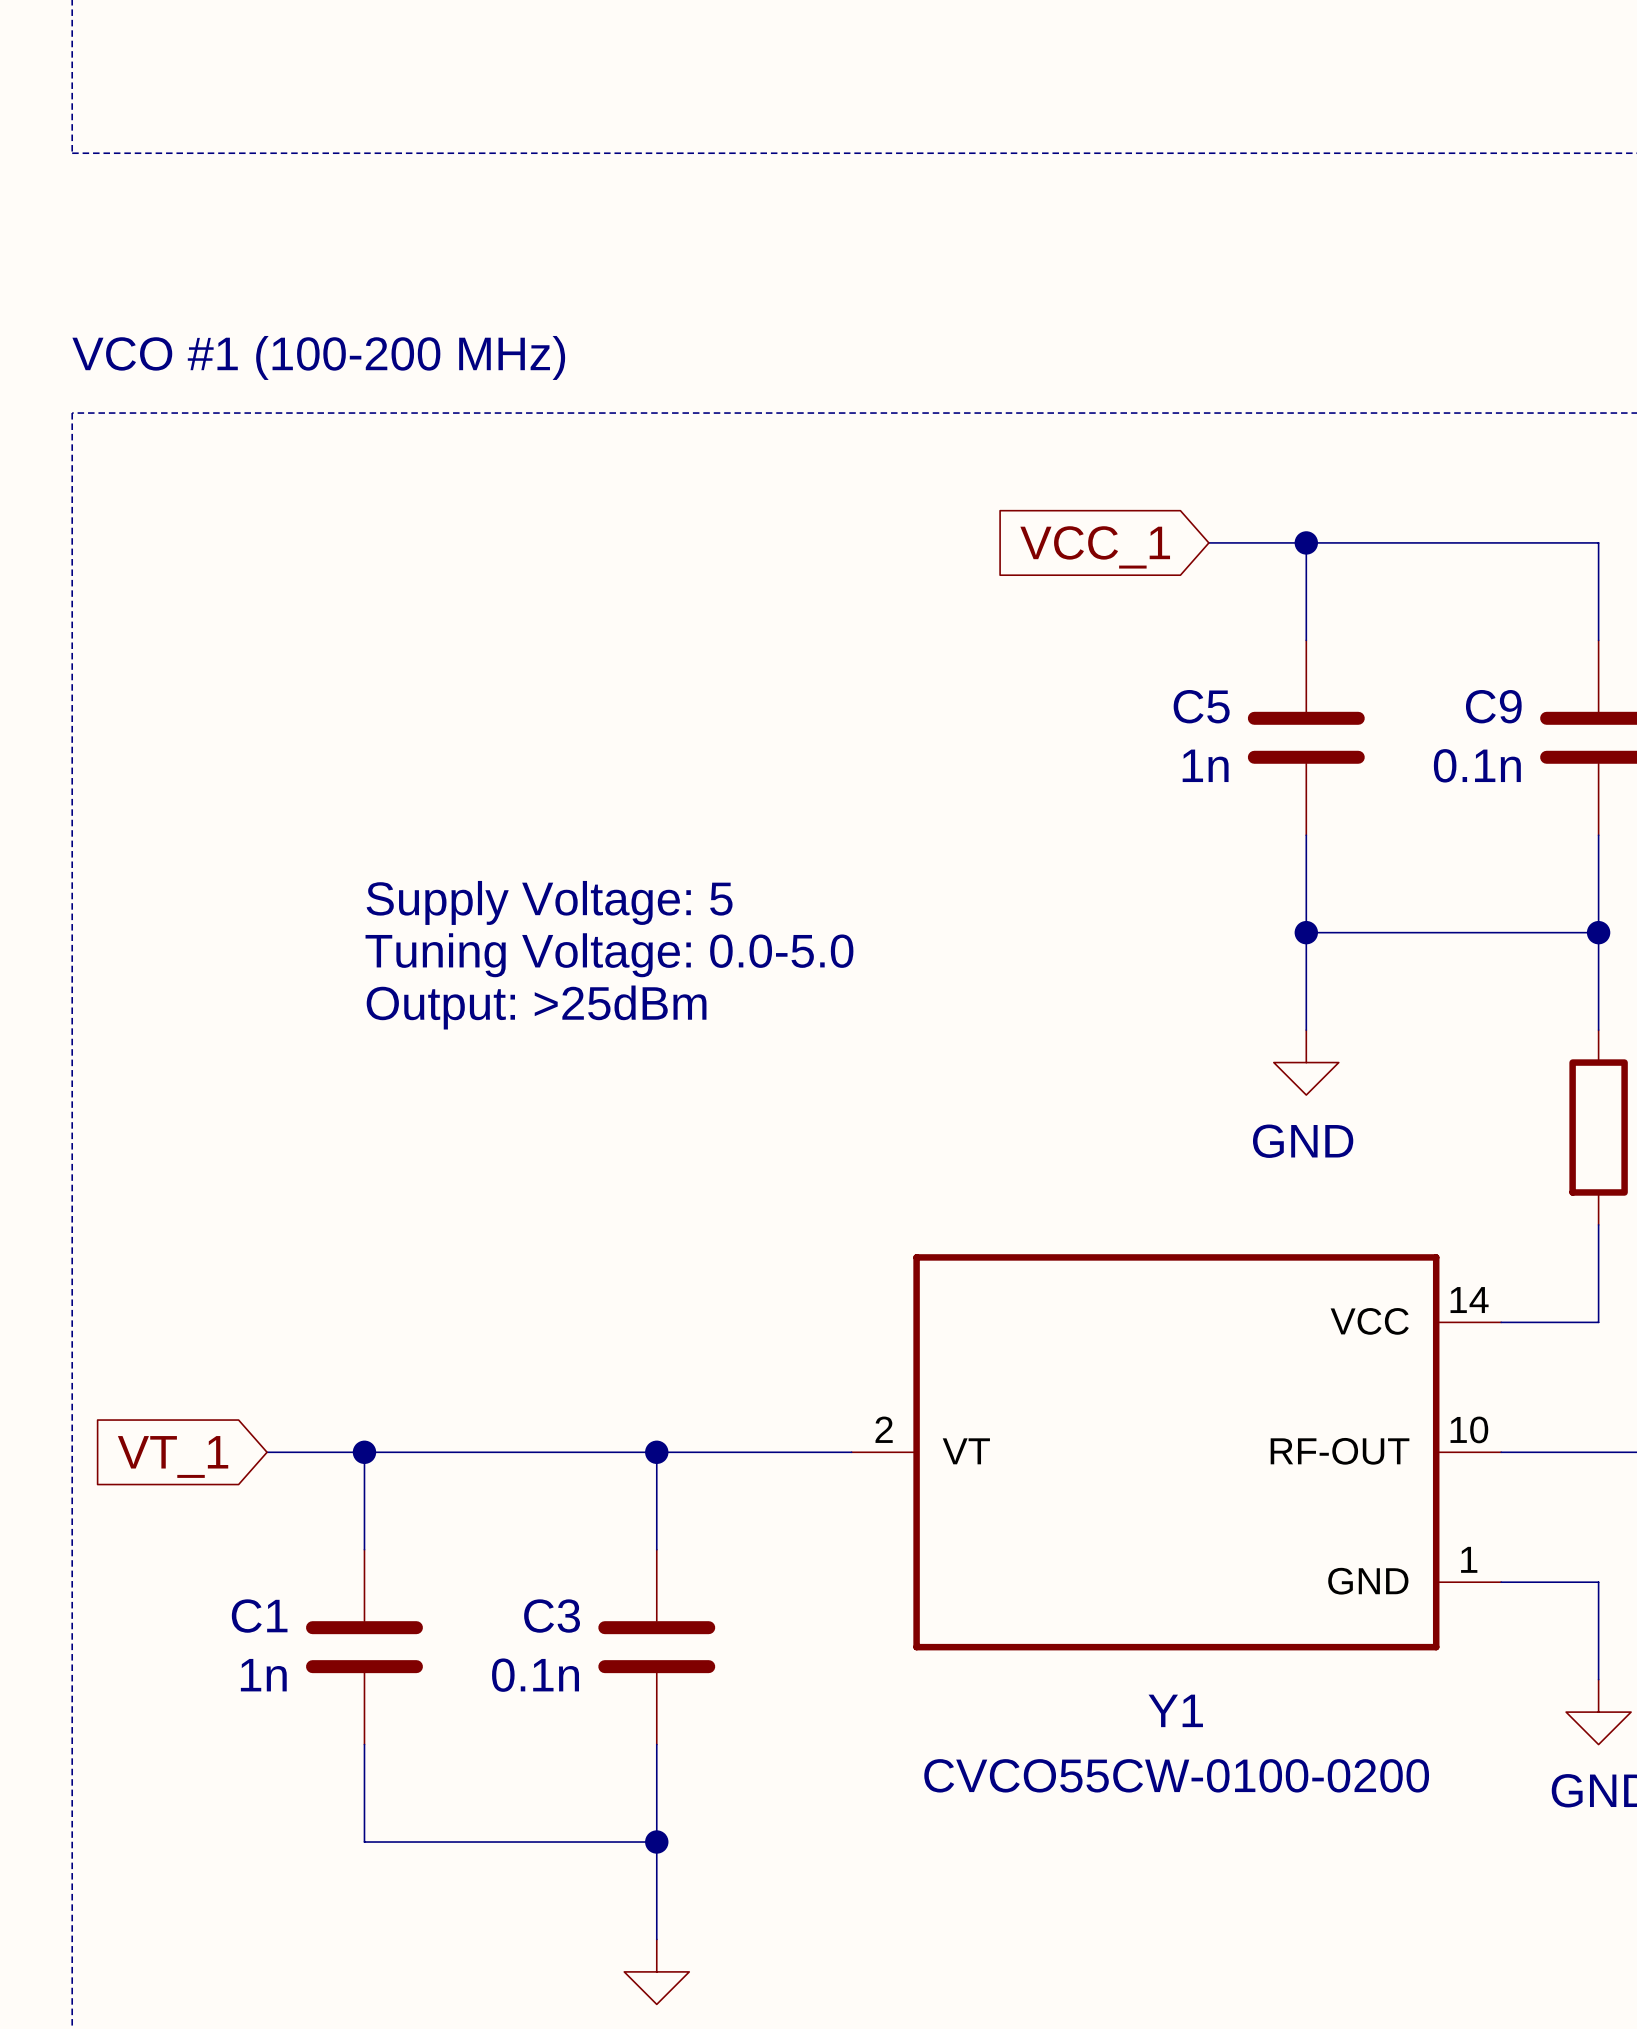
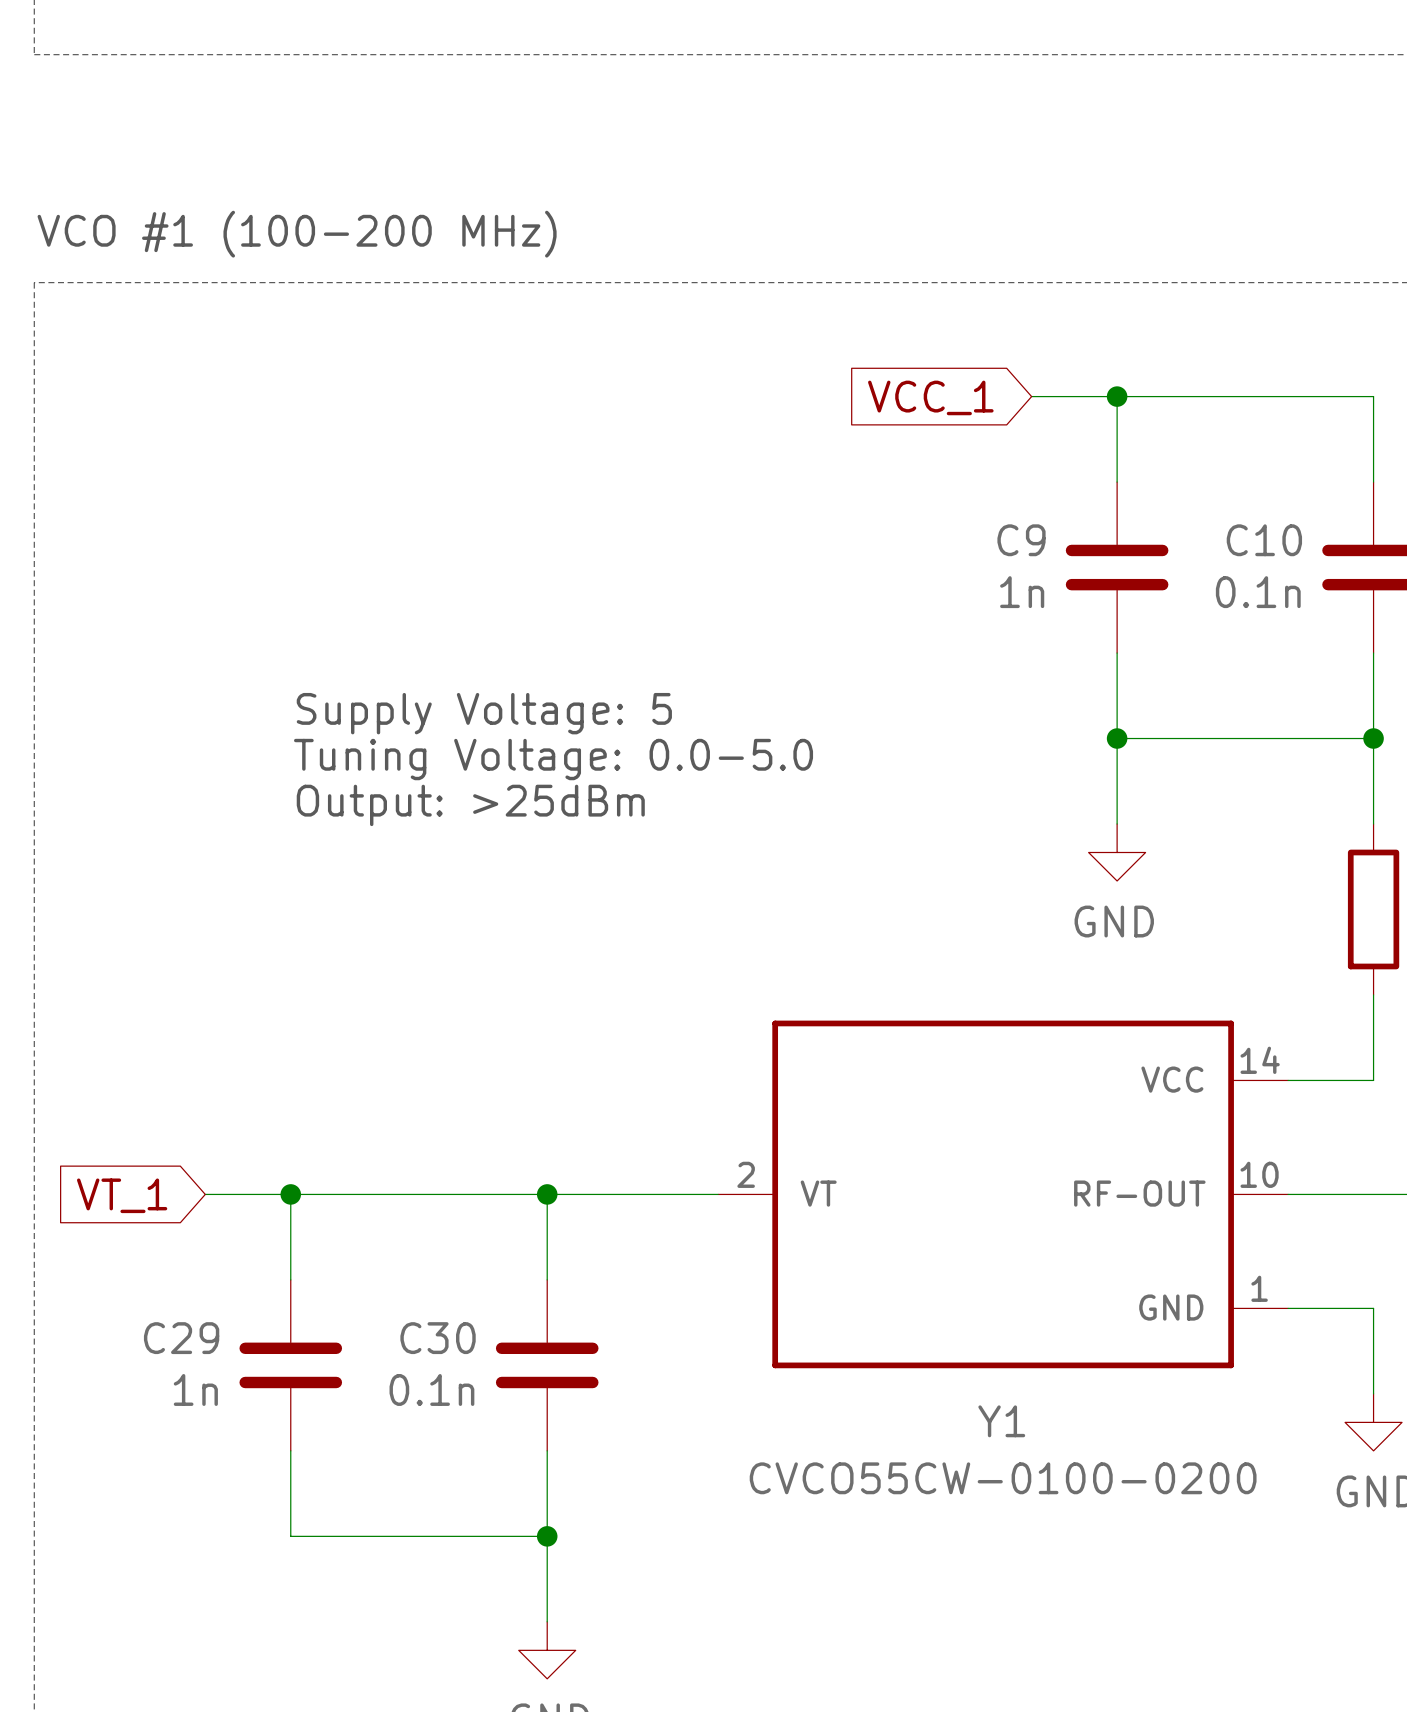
C5 name: C5 (1201, 706) -> C9 (1021, 540)
C9 name: C9 (1493, 706) -> C10 (1264, 540)
C1 name: C1 (259, 1616) -> C29 (181, 1338)
C3 name: C3 (552, 1616) -> C30 (438, 1338)

